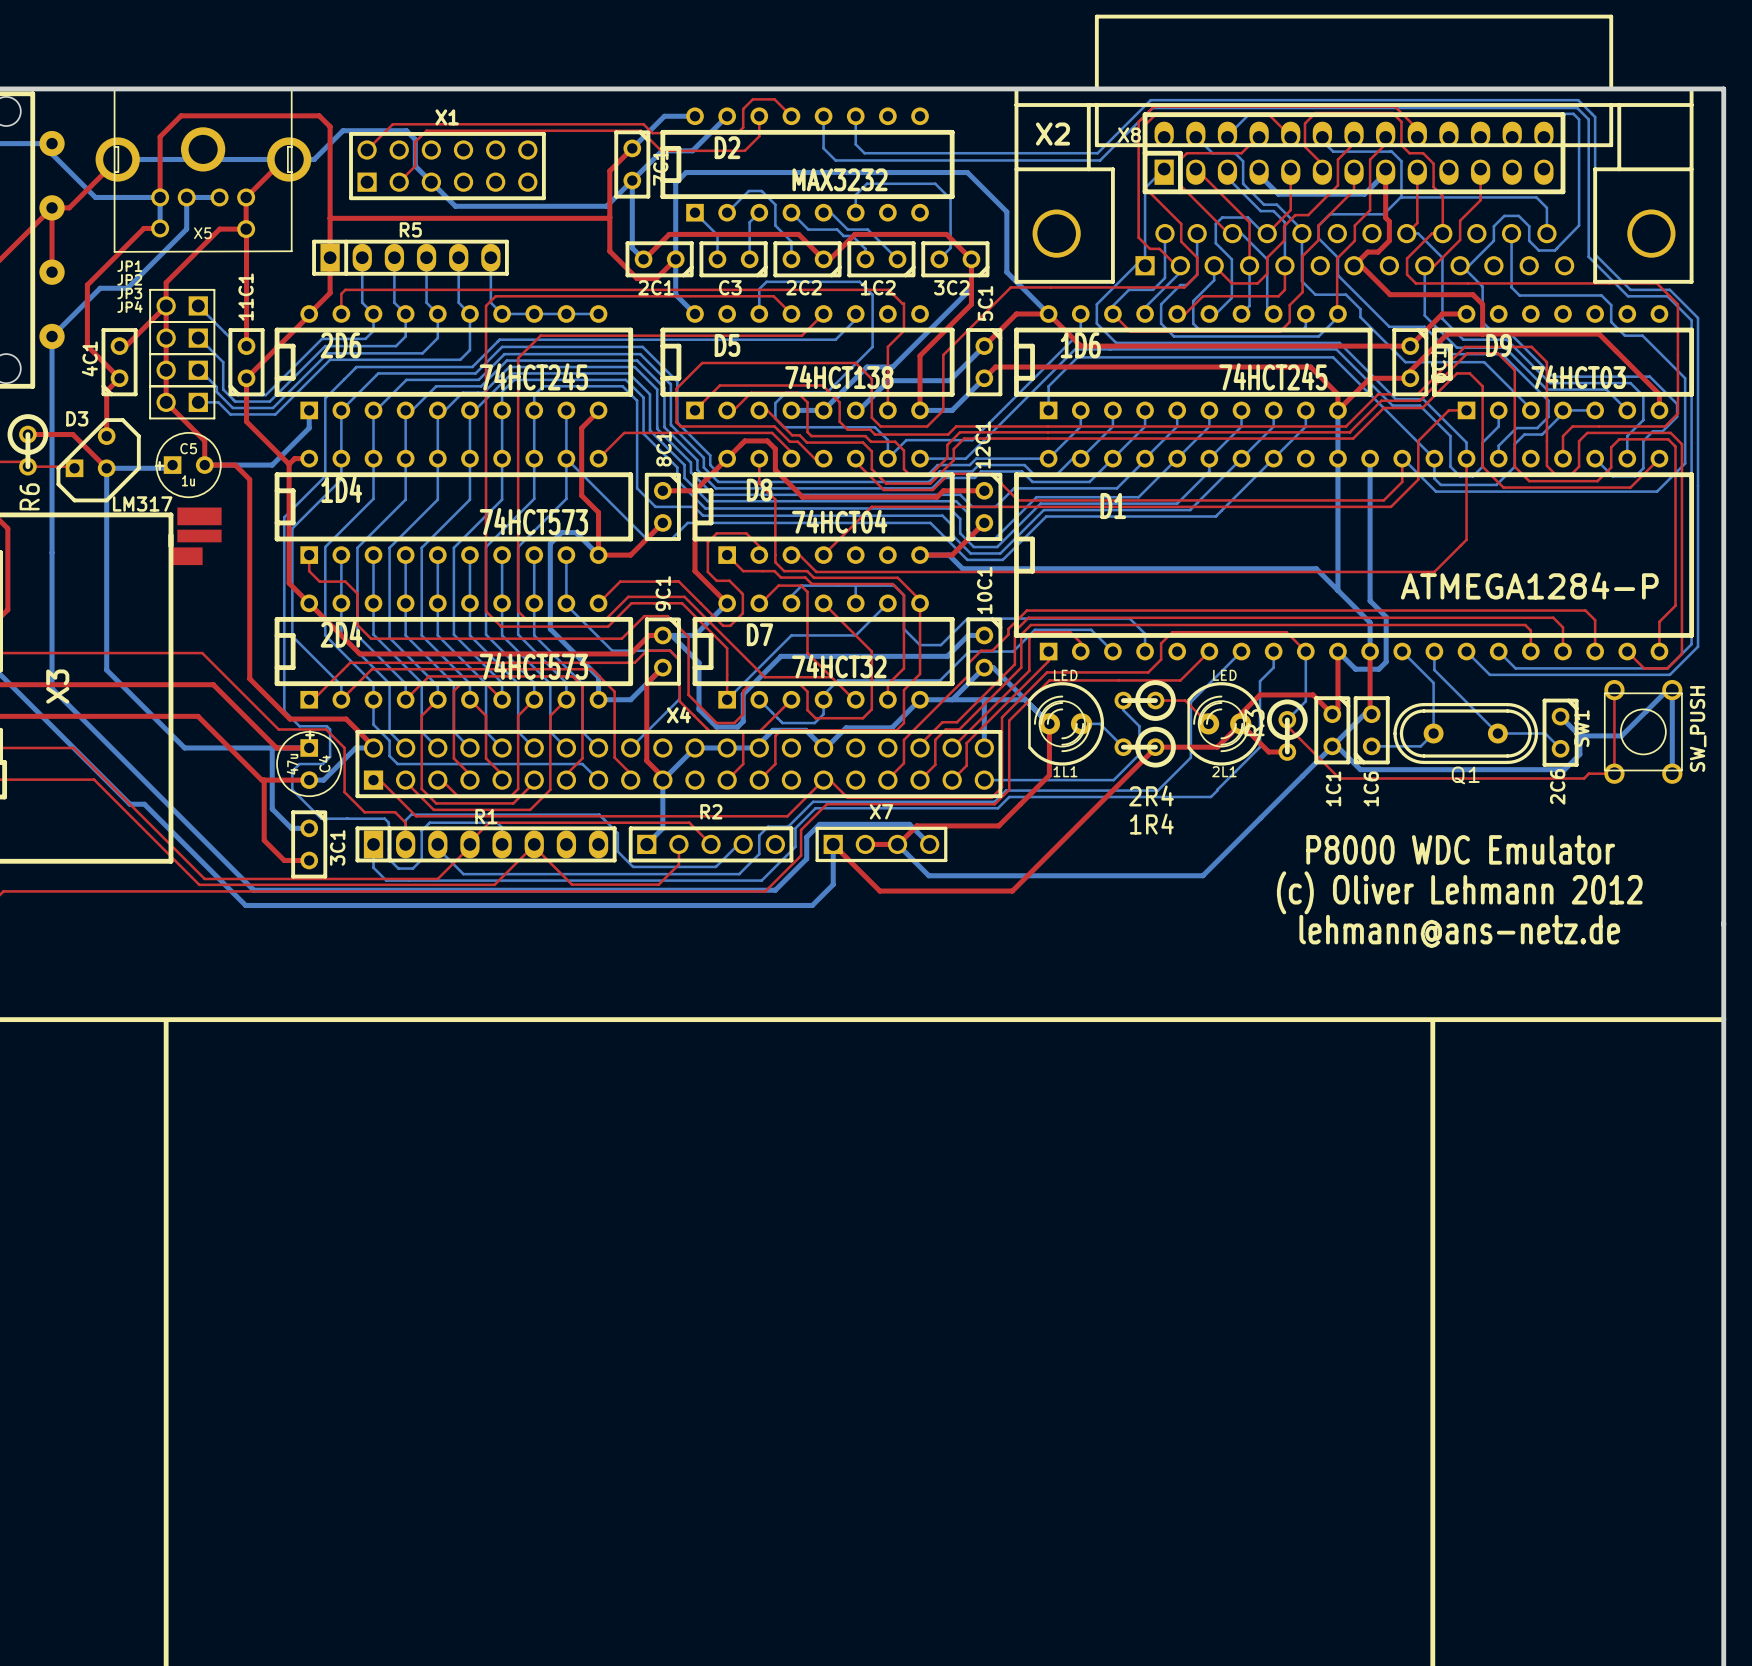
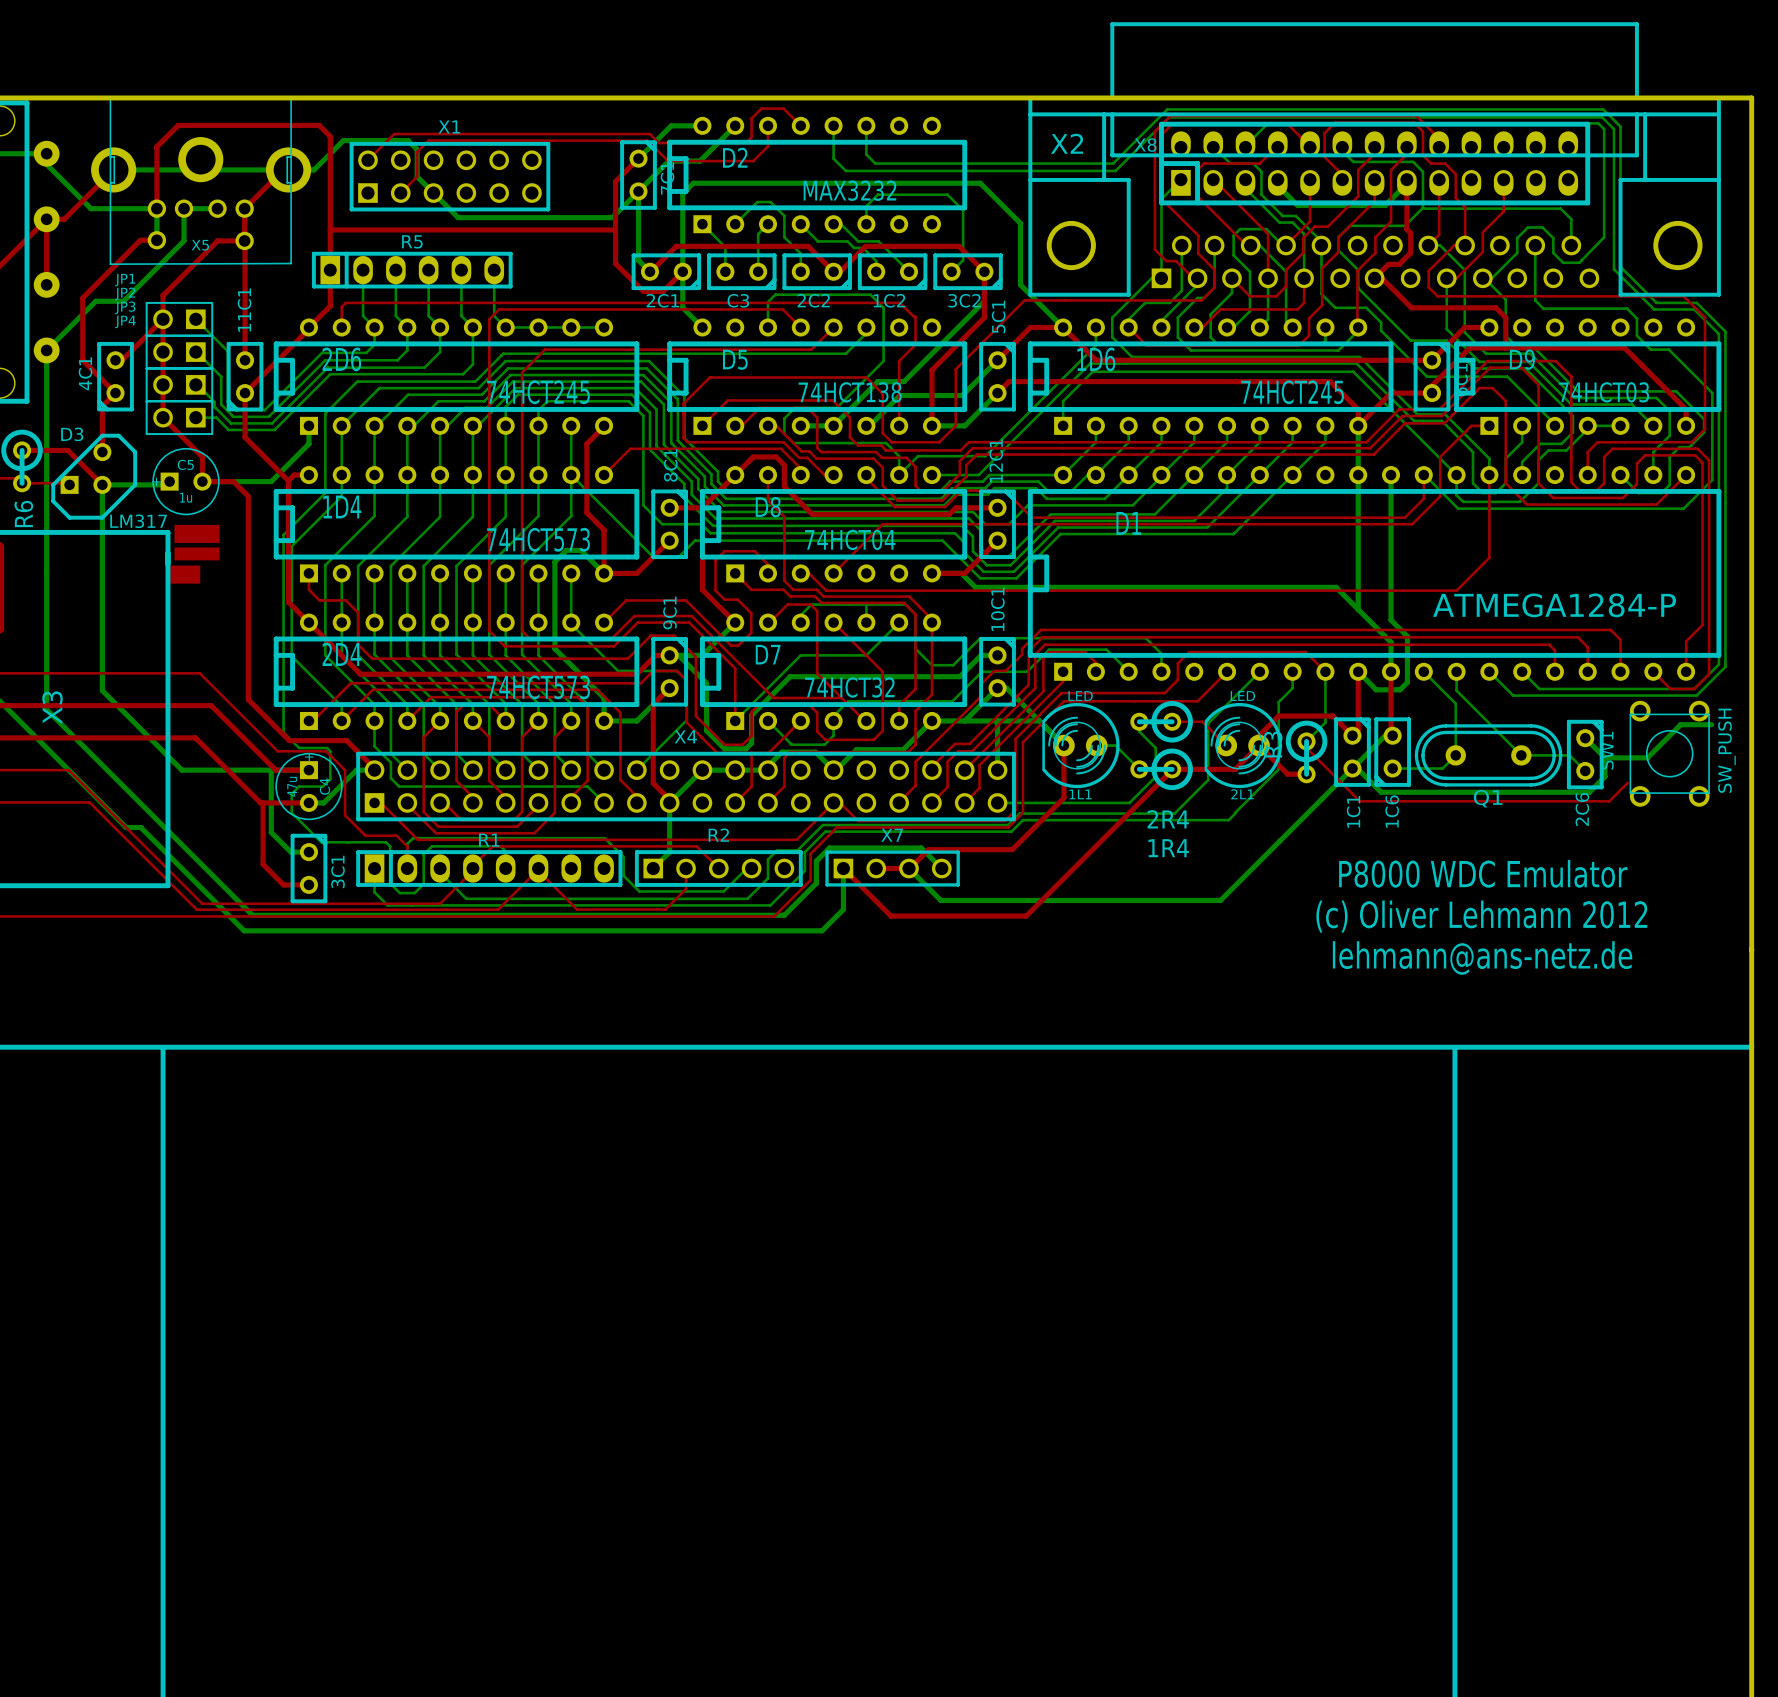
top track: (1614, 690) (1614, 773) (1588, 773) -> (1627, 782) (1614, 796)
bottom track: (1654, 703) (1667, 690) (1672, 690) (1672, 773) -> (1680, 724) (1711, 724)

